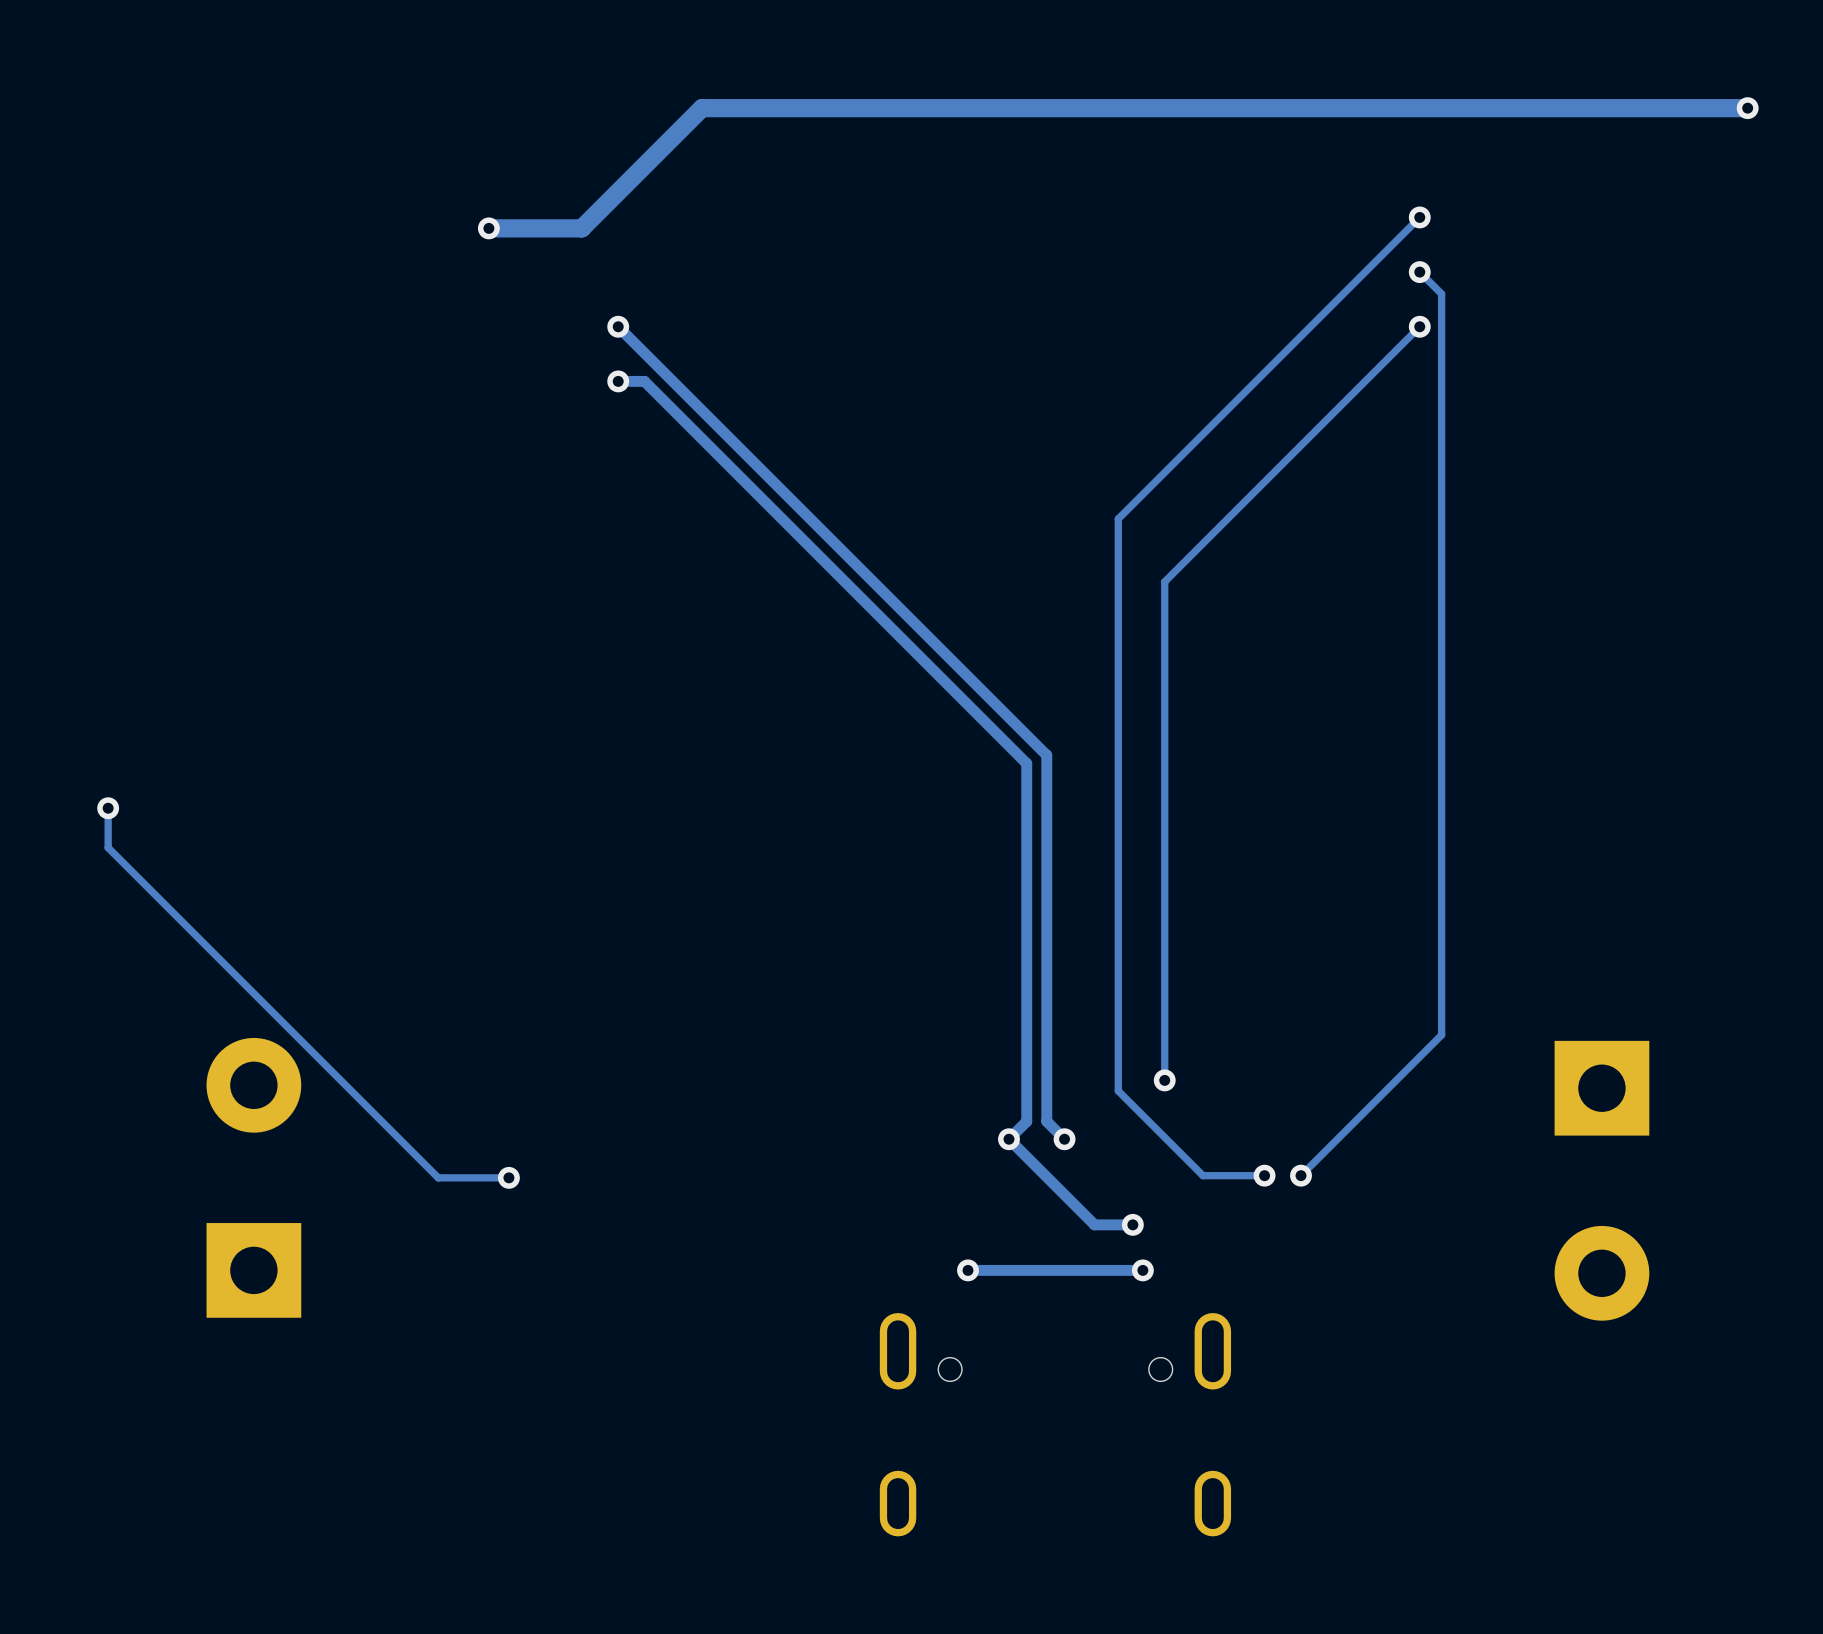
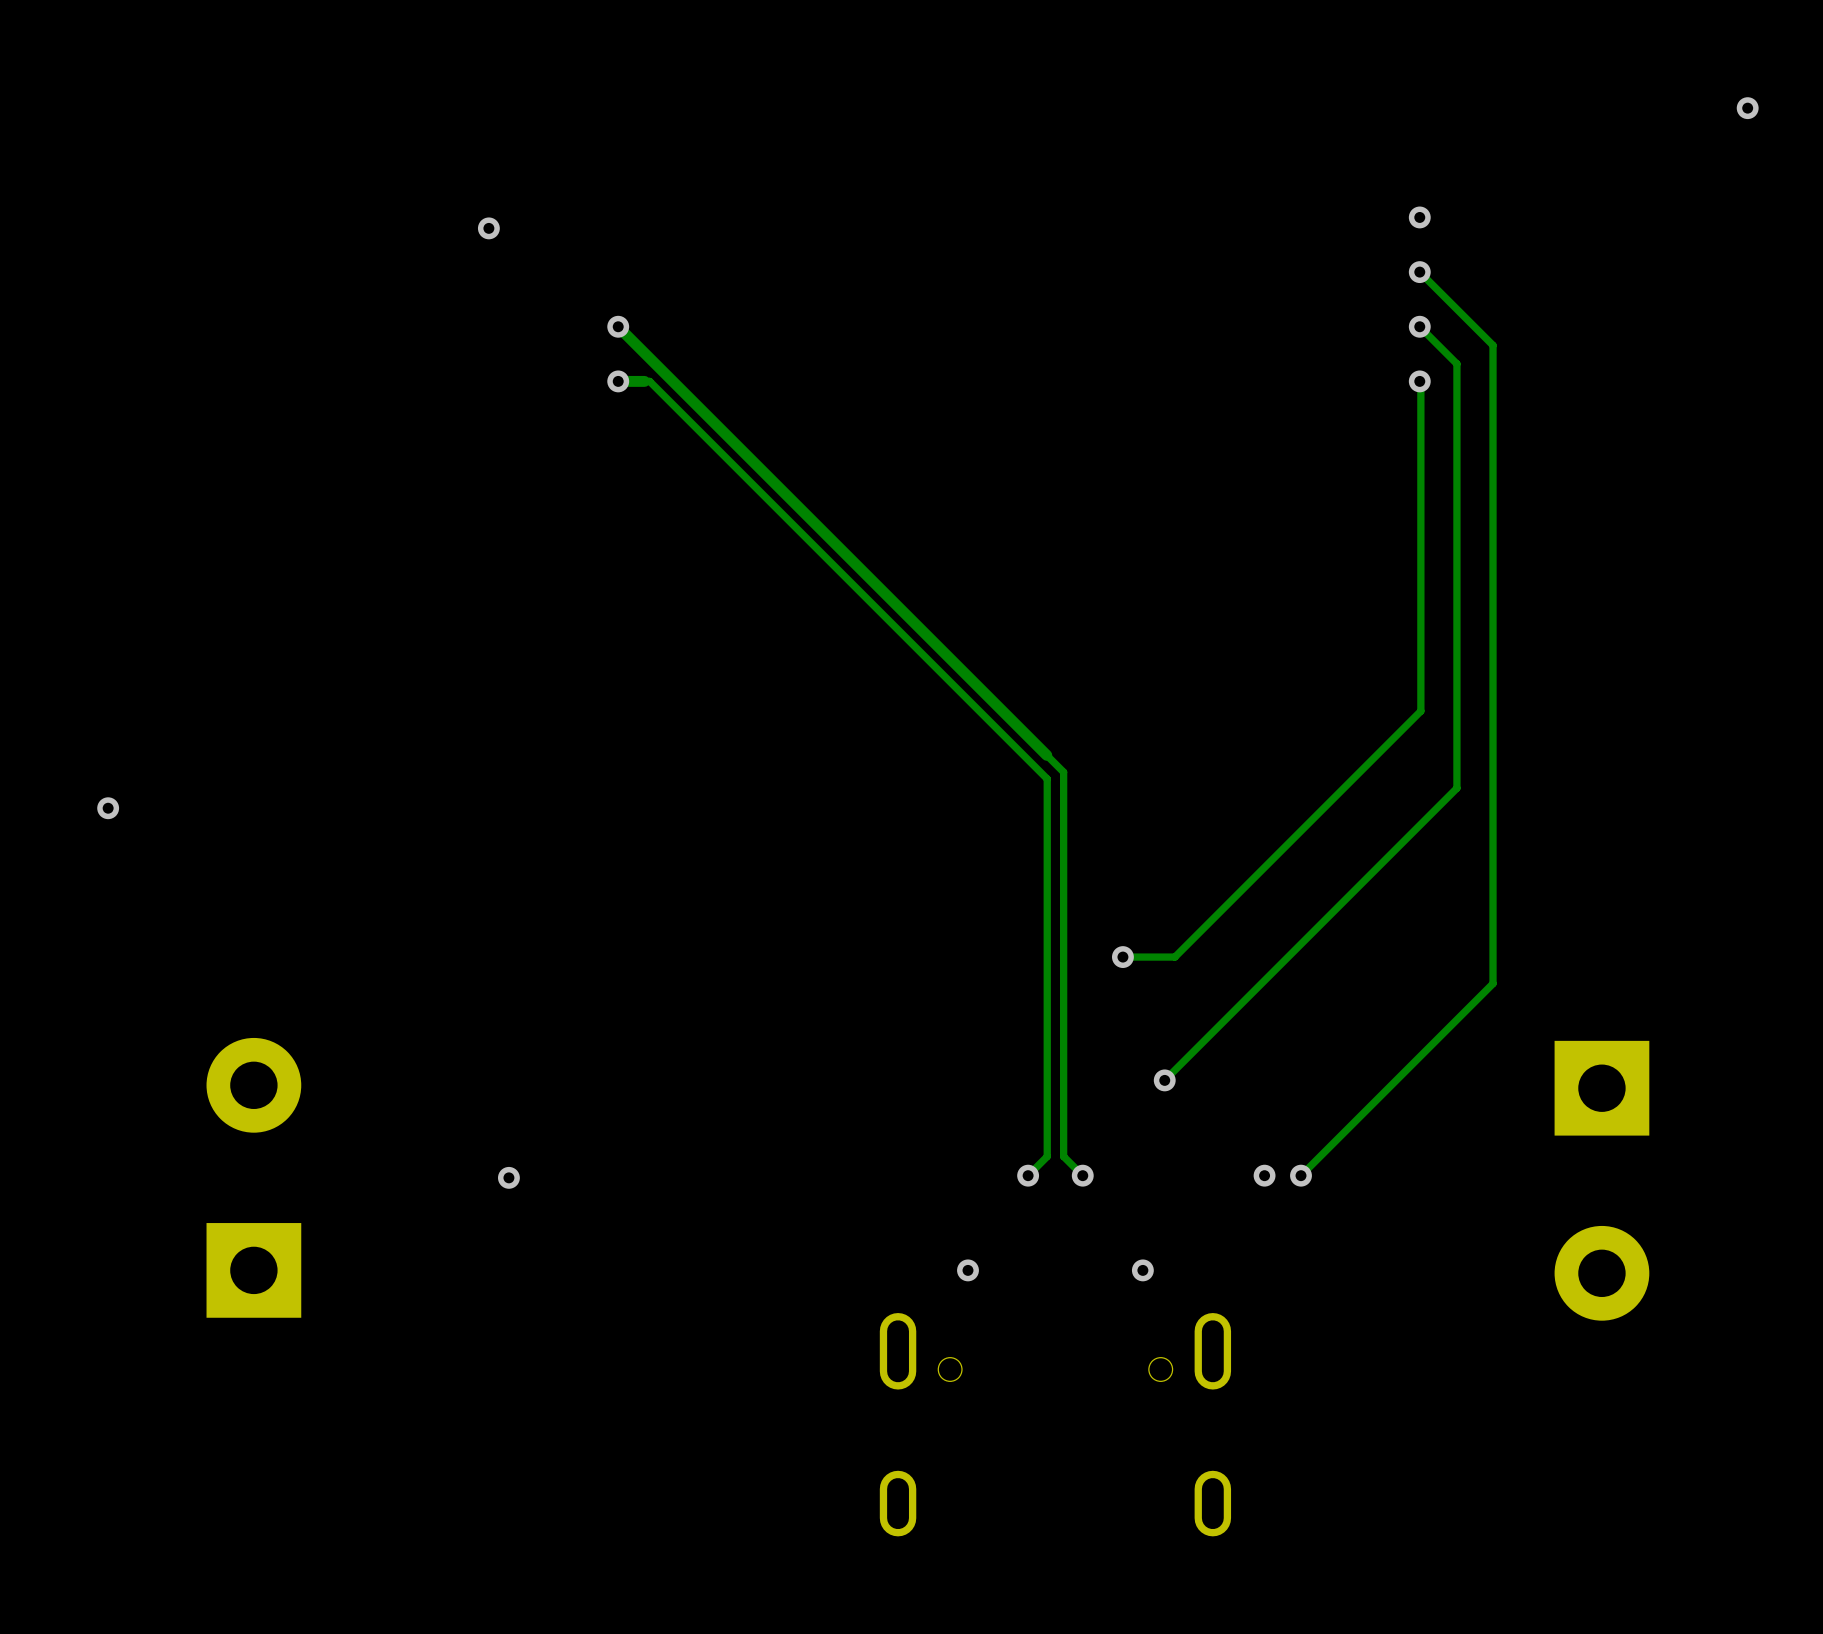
track: (1747, 108) (702, 108) (581, 228) (488, 228) -> none
track: (1419, 217) (1118, 518) (1118, 1090) (1202, 1175) (1264, 1175) -> none
track: (1441, 293) (1441, 1035) -> (1441, 293) (1493, 345) (1493, 983) (1441, 1035)
track: (1419, 326) (1164, 581) (1164, 1080) -> (1419, 326) (1456, 363) (1456, 788) (1164, 1080)
track: (644, 381) (1026, 763) (1026, 1121) (1008, 1139) (1094, 1224) (1132, 1224) -> (644, 381) (649, 381) (1047, 778) (1047, 1156) (1028, 1175)
track: none -> (1419, 381) (1420, 711) (1174, 957) (1122, 957)
via: none -> (1419, 381)
track: (1046, 755) (1046, 1121) (1064, 1139) -> (1046, 755) (1063, 772) (1063, 1156) (1082, 1175)
track: (108, 808) (108, 847) (438, 1177) (508, 1177) -> none
via: none -> (1122, 957)
via: (1008, 1139) -> none
via: (1064, 1139) -> none
via: none -> (1028, 1175)
via: none -> (1082, 1175)
via: (1132, 1224) -> none
track: (1142, 1270) (967, 1270) -> none

